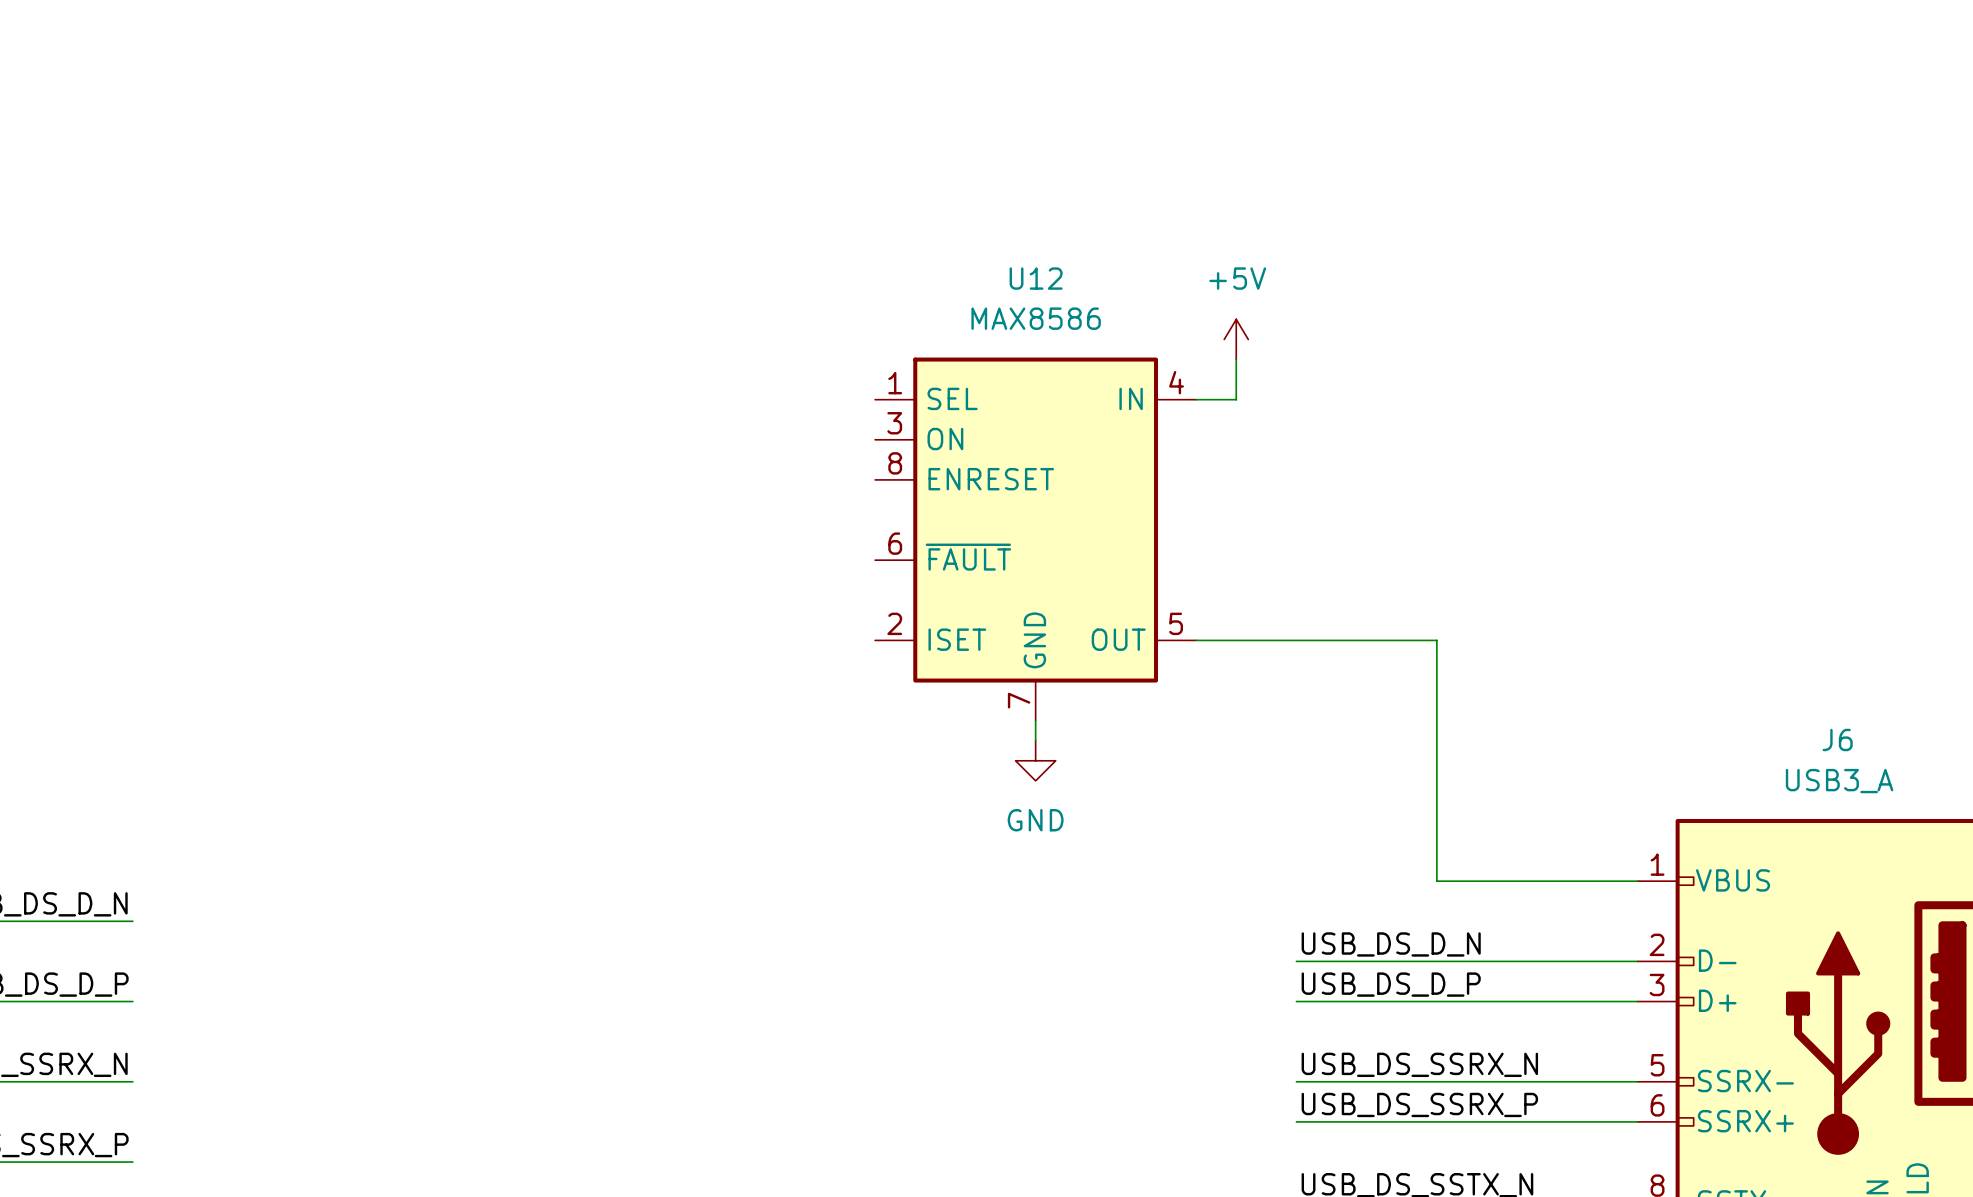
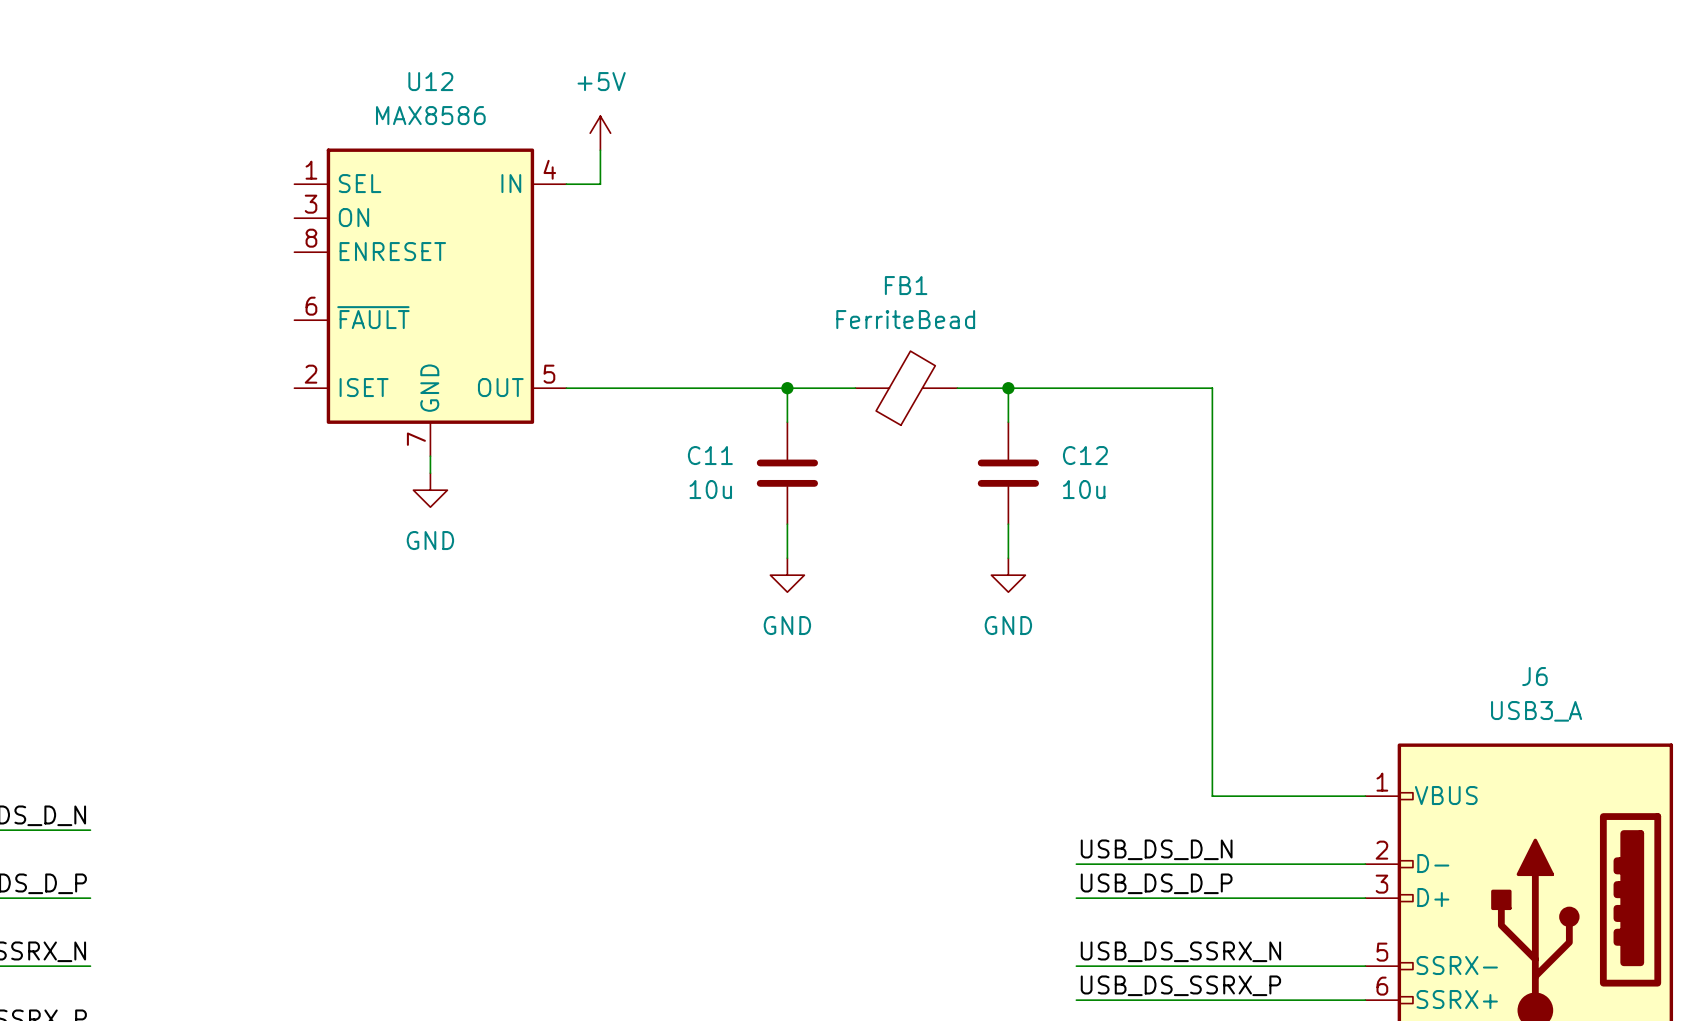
power symbol: none -> +5V (600, 133)
wire: none -> (600, 150) (600, 184) (566, 184)
power symbol: +5V (1236, 339) -> none
wire: (1236, 359) (1236, 399) -> (1008, 388) (1008, 422)
wire: none -> (566, 388) (855, 388)
junction: none -> (787, 388)
FB1: none -> FerriteBead (906, 388)
junction: none -> (1008, 388)
wire: none -> (430, 456) (430, 473)
C11: none -> 10u (787, 473)
C12: none -> 10u (1008, 473)
power symbol: none -> GND (430, 490)
U12 position: (1035, 539) -> (430, 302)
wire: none -> (1008, 524) (1008, 558)
power symbol: none -> GND (787, 575)
power symbol: none -> GND (1008, 575)
wire: (1196, 640) (1436, 640) (1436, 881) (1456, 881) -> (1025, 388) (1212, 388) (1212, 796)
wire: (1035, 720) (1035, 740) -> none
power symbol: GND (1035, 760) -> none

